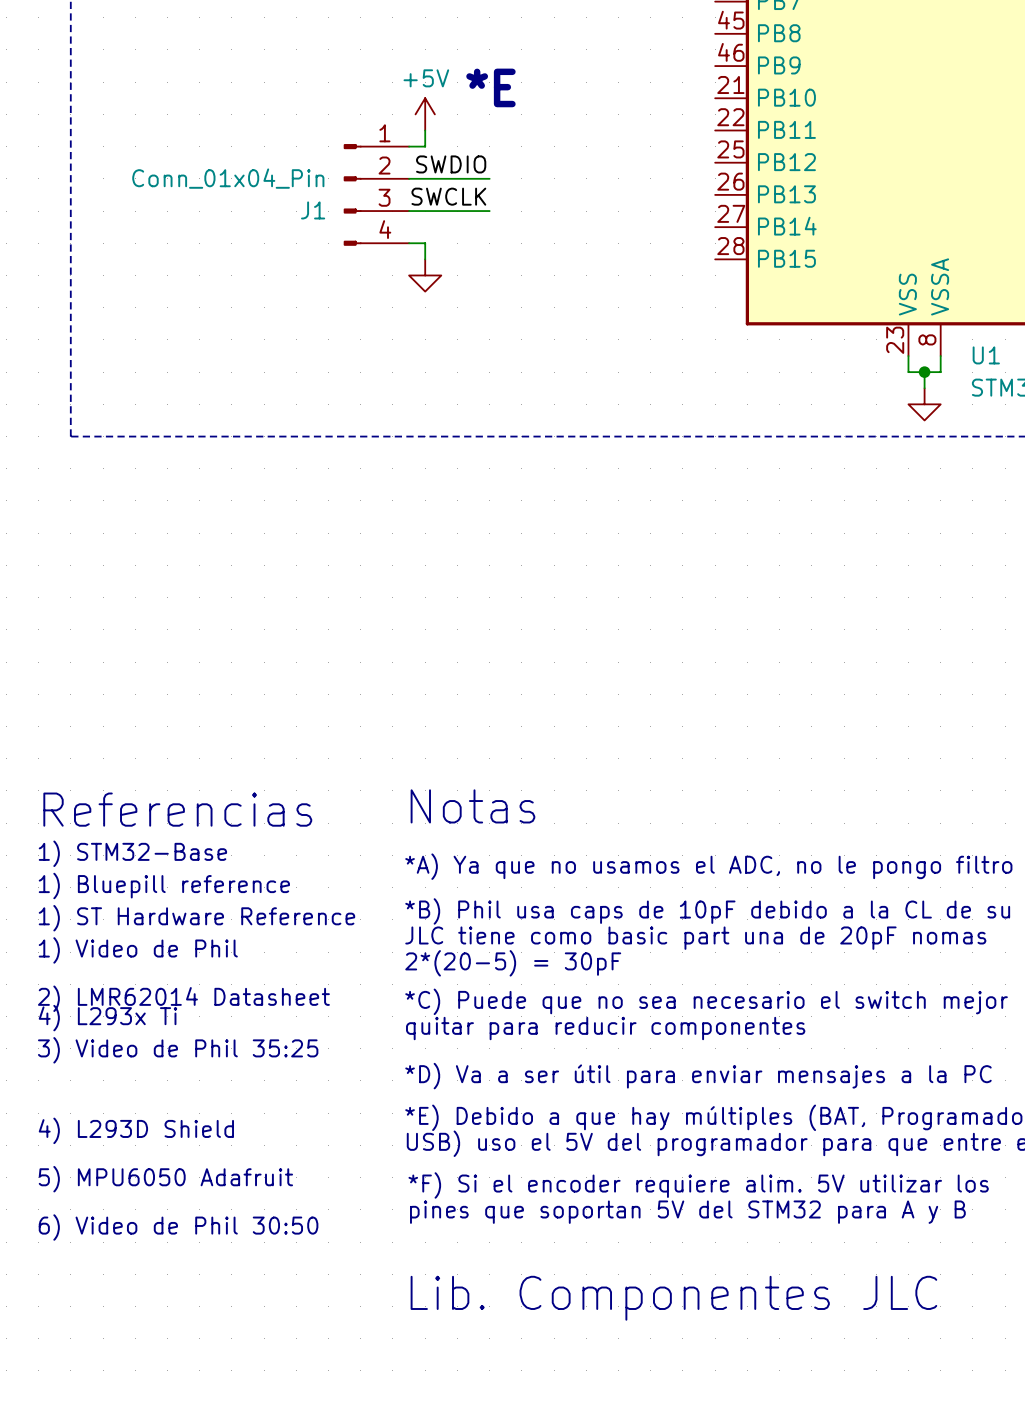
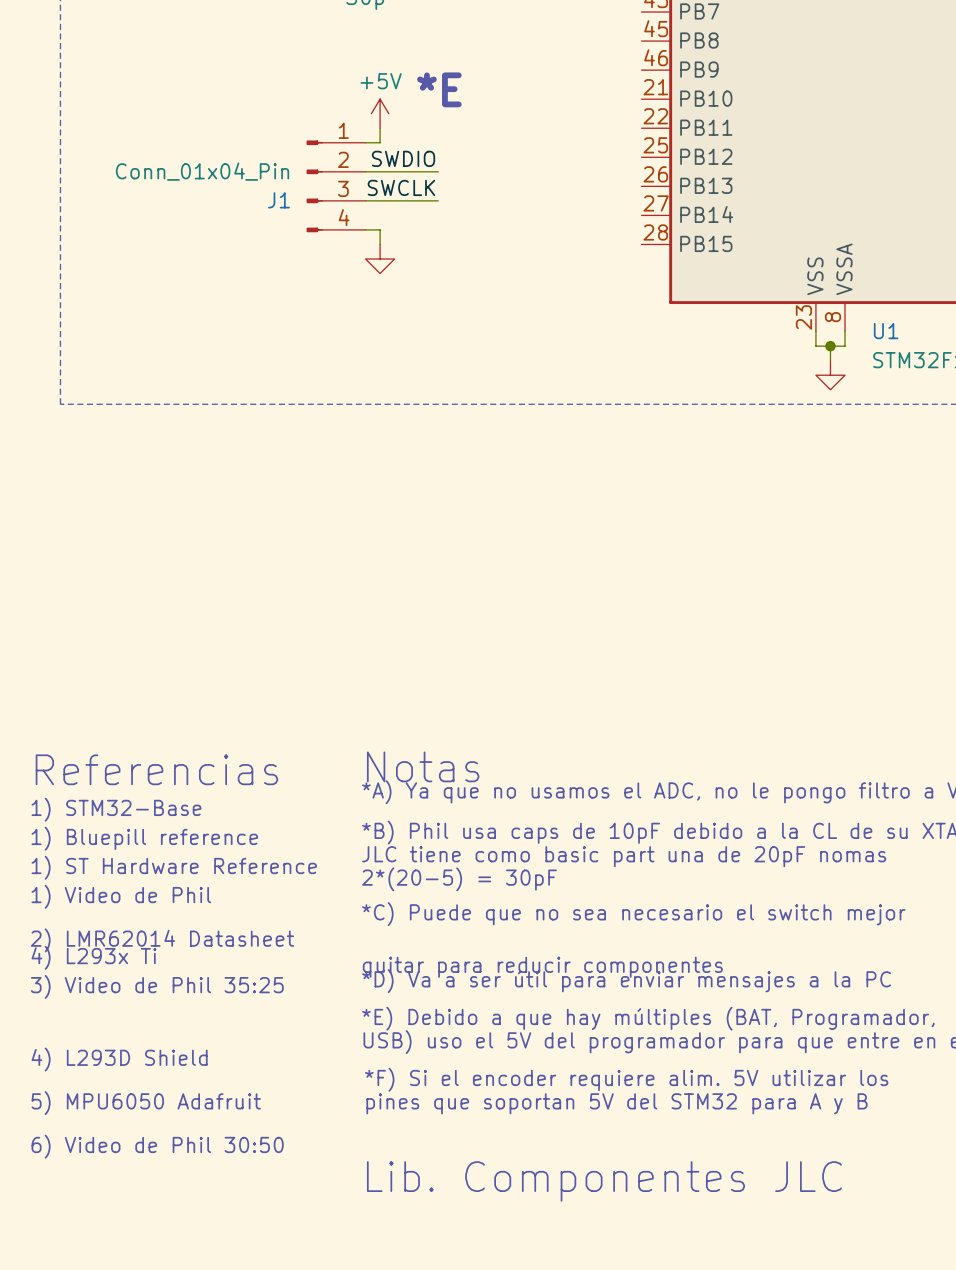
text position: Notas (472, 806) -> Notas (423, 766)
text: Referencias (177, 809) -> none
text: 1) STM32-Base (132, 853) -> Referencias (156, 769)
text: 1) Bluepill reference (164, 886) -> 1) STM32-Base (116, 809)
text: 1) ST Hardware Reference (196, 918) -> 1) Bluepill reference (144, 838)
text: 1) Video de Phil (138, 950) -> 1) ST Hardware Reference (174, 867)
text: none -> 1) Video de Phil (121, 896)
text position: 2) LMR62014 Datasheet (183, 998) -> 2) LMR62014 Datasheet (162, 940)
text: 4) L293x Ti (107, 1018) -> none
text position: quitar para reducir componentes (605, 1028) -> quitar para reducir componentes (542, 967)
text: 3) Video de Phil 35:25 (178, 1050) -> 4) L293x Ti (93, 957)
text: none -> 3) Video de Phil 35:25 (157, 986)
text position: 4) L293D Shield (136, 1130) -> 4) L293D Shield (119, 1059)
text position: 5) MPU6050 Adafruit (165, 1179) -> 5) MPU6050 Adafruit (146, 1103)
text position: 6) Video de Phil 30:50 (178, 1227) -> 6) Video de Phil 30:50 (157, 1146)

